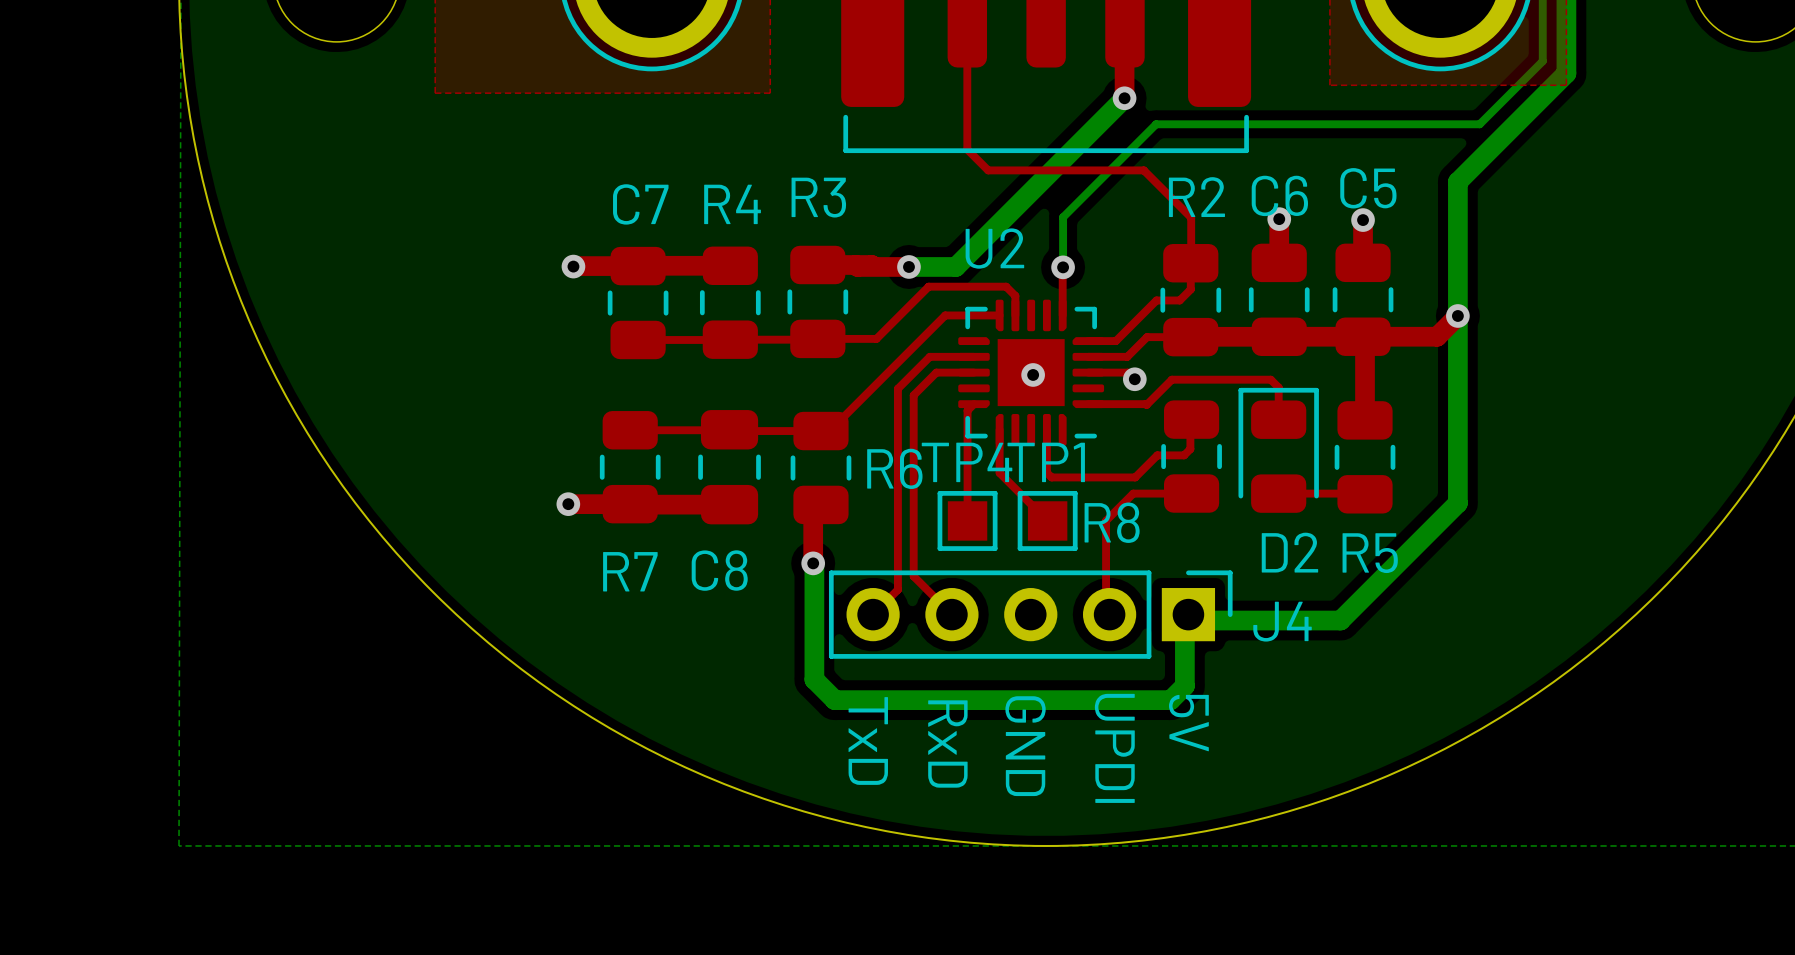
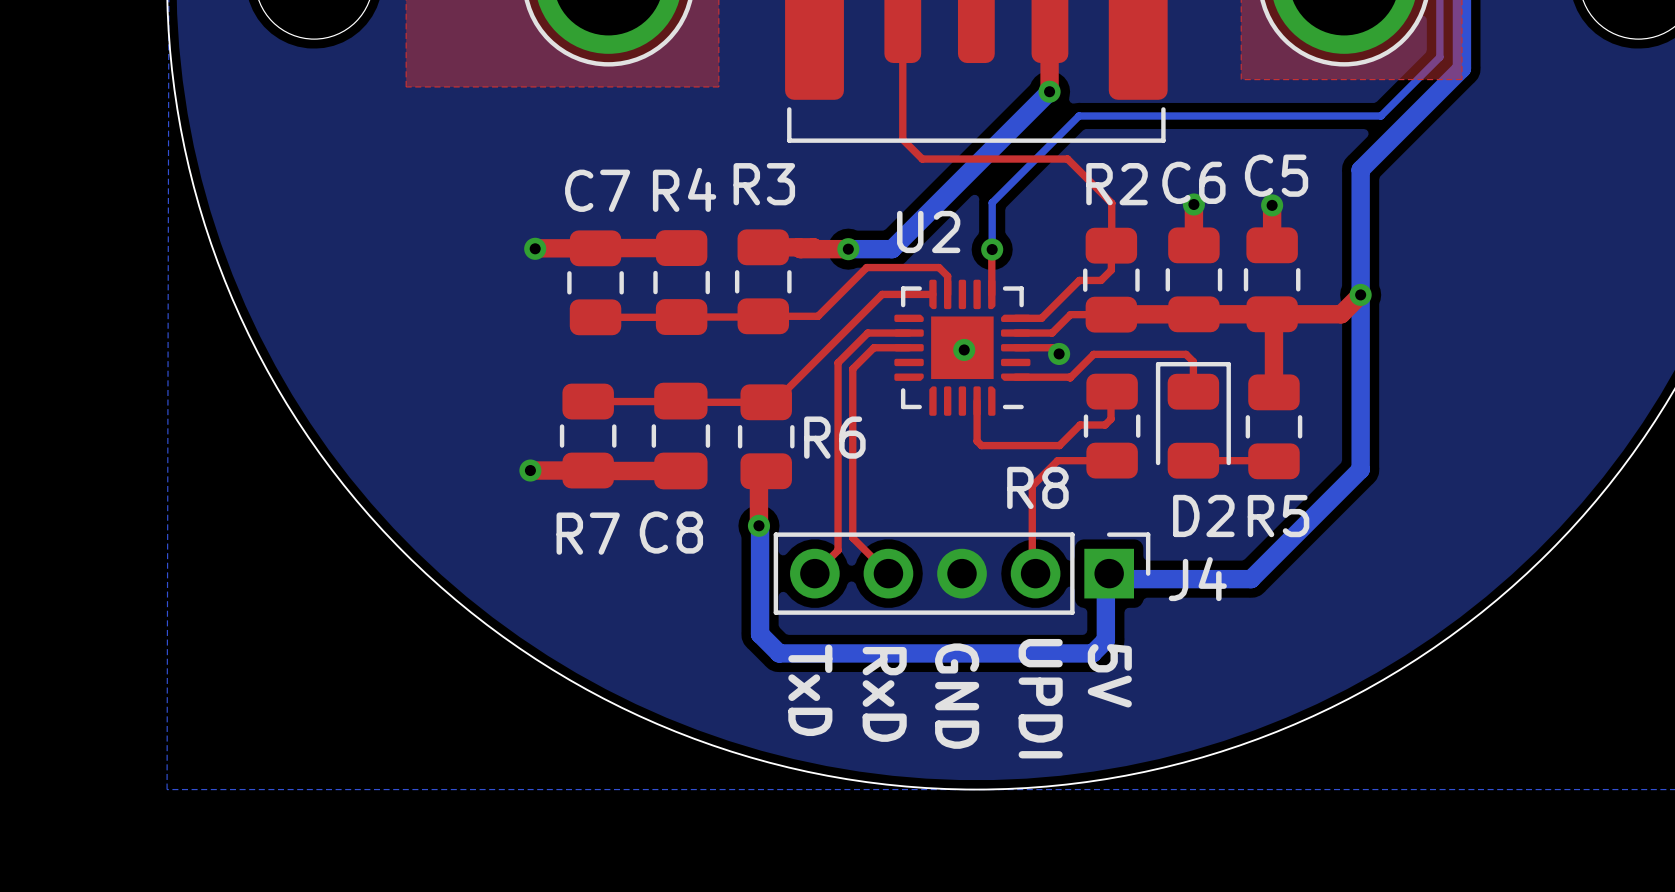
top track: (974, 404) (967, 410) (967, 520) -> none
top track: (999, 429) (999, 472) (1047, 520) -> none
TP4: (967, 520) -> none
TP1: (1047, 520) -> none

